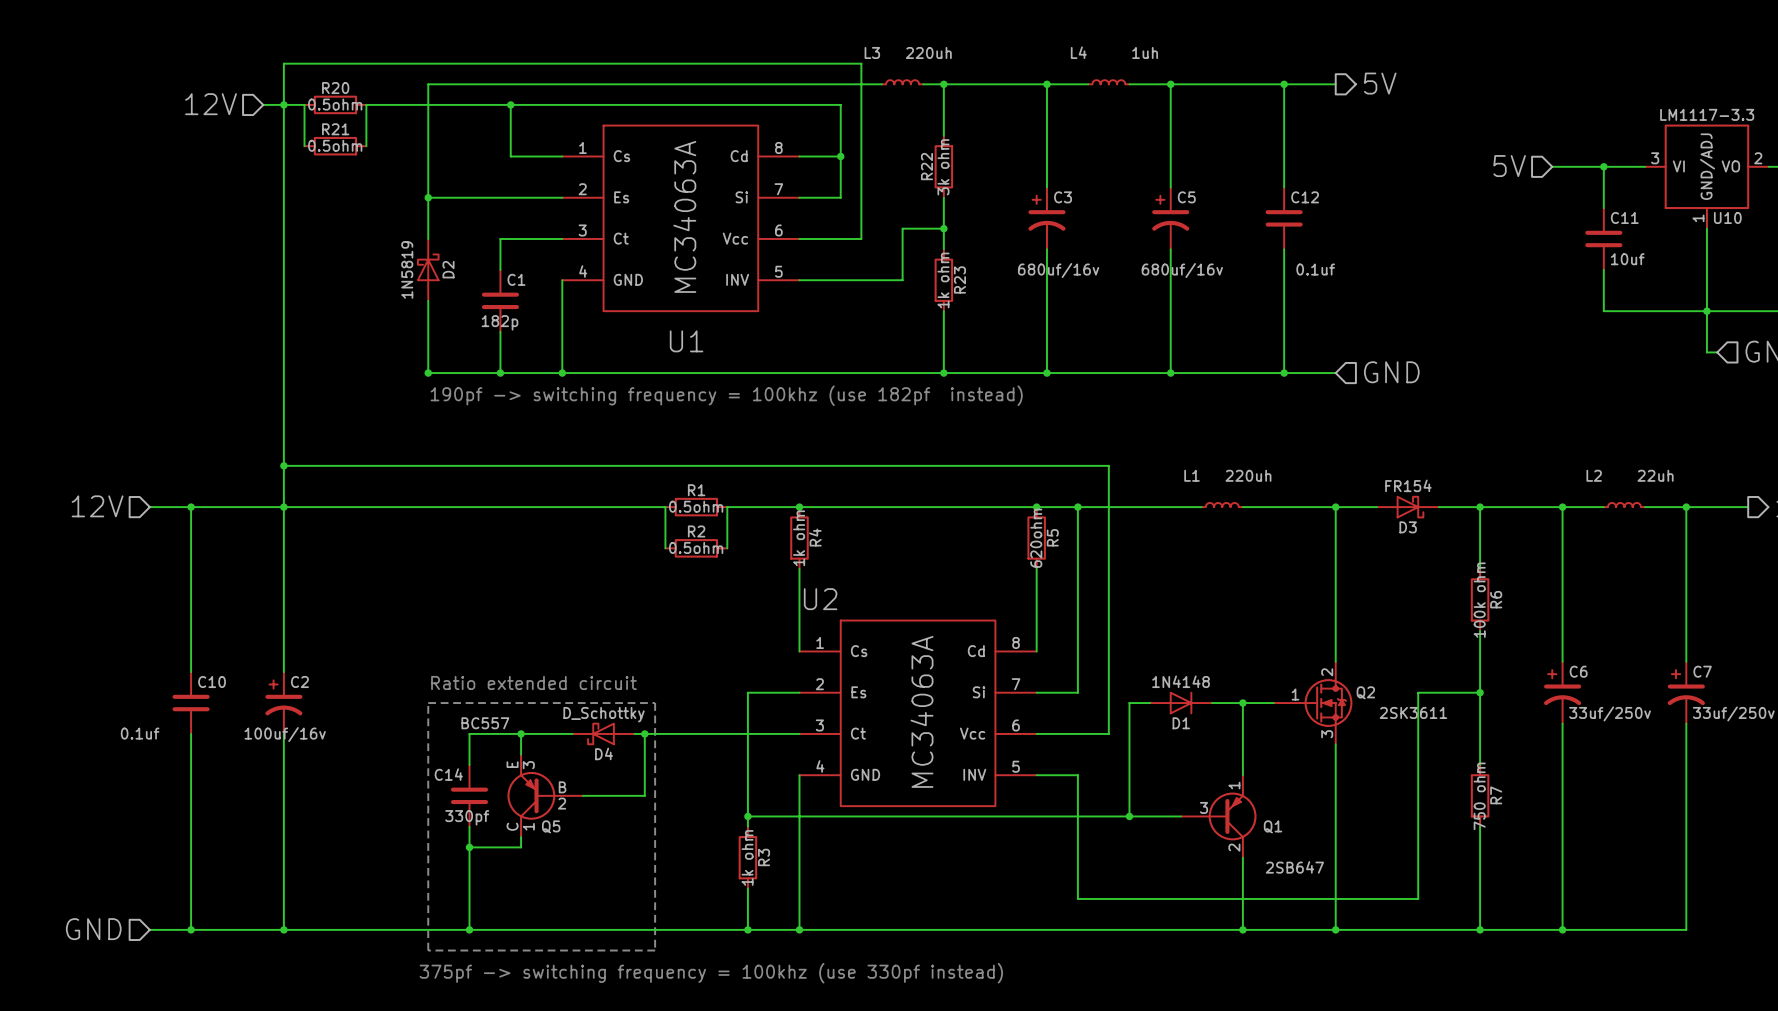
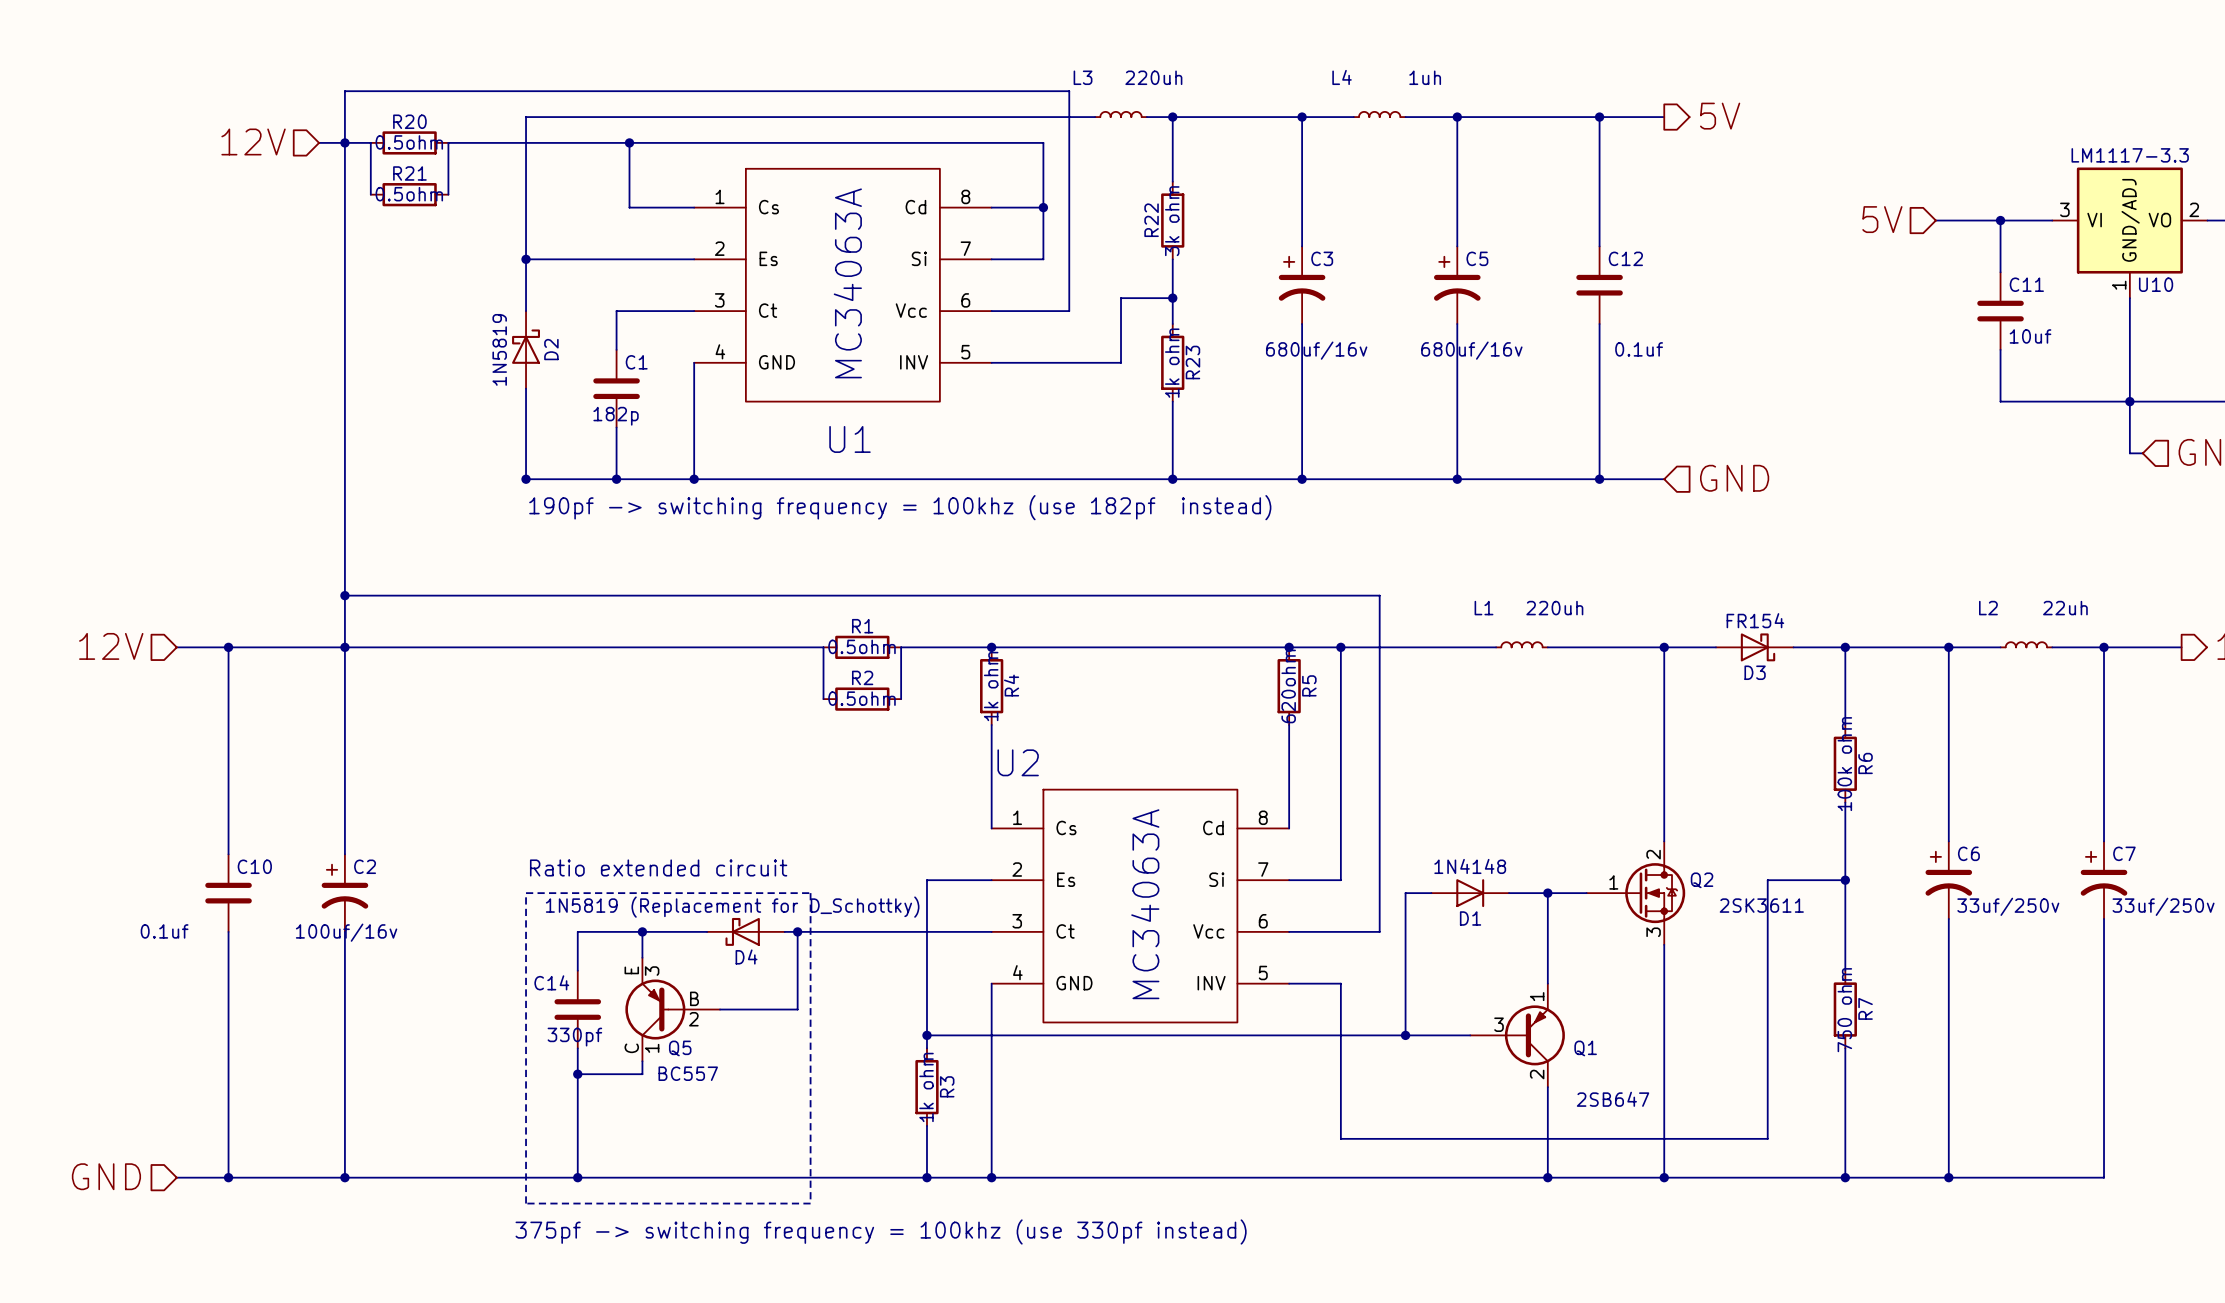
D4 value: D_Schottky (604, 714) -> 1N5819 (Replacement for D_Schottky) (732, 907)
Q5 value position: BC557 (485, 723) -> BC557 (688, 1073)

